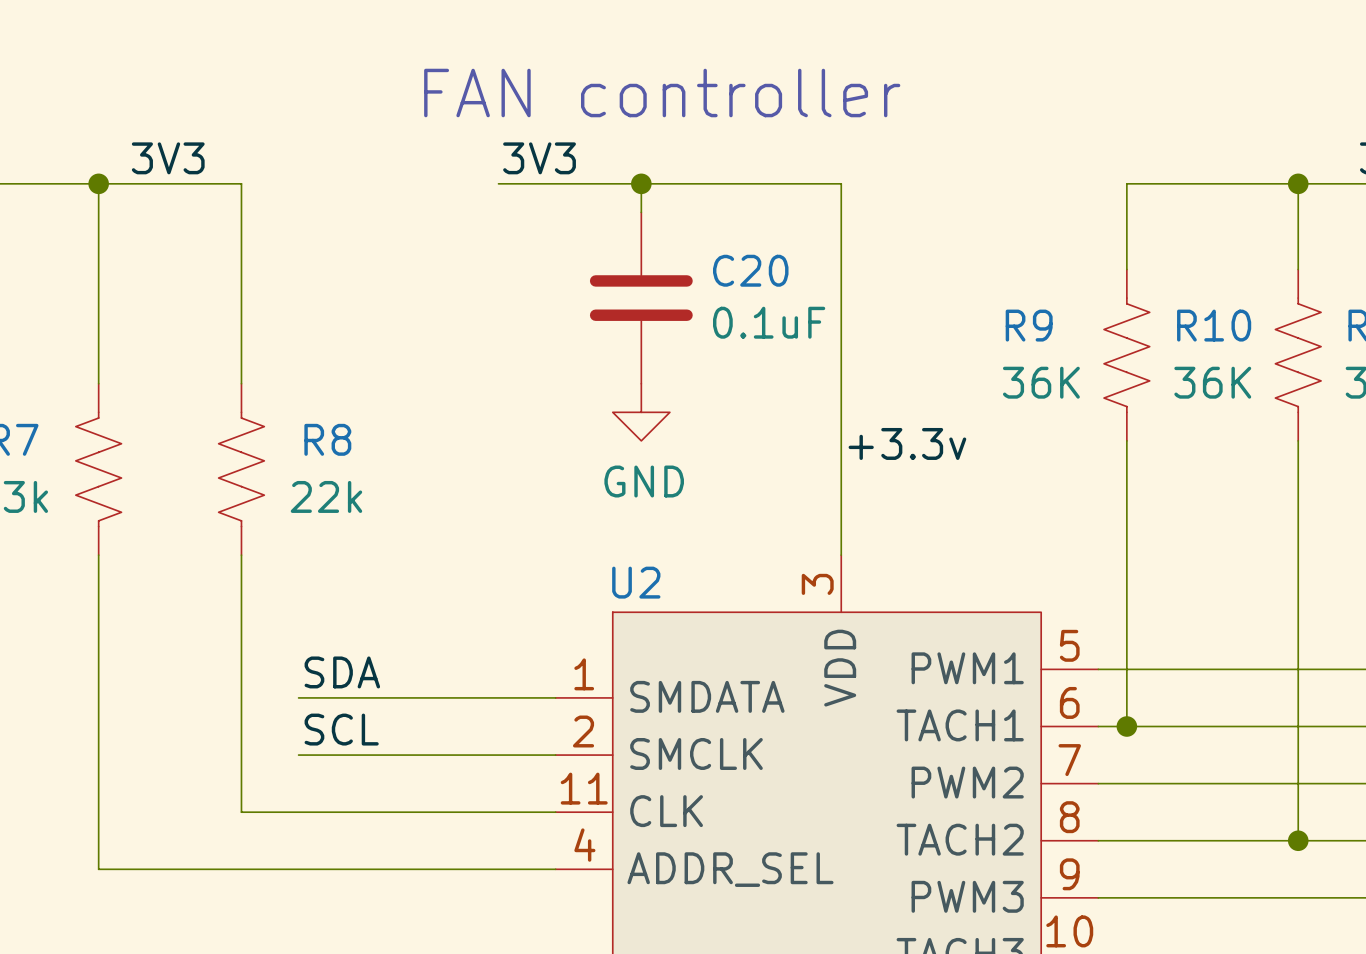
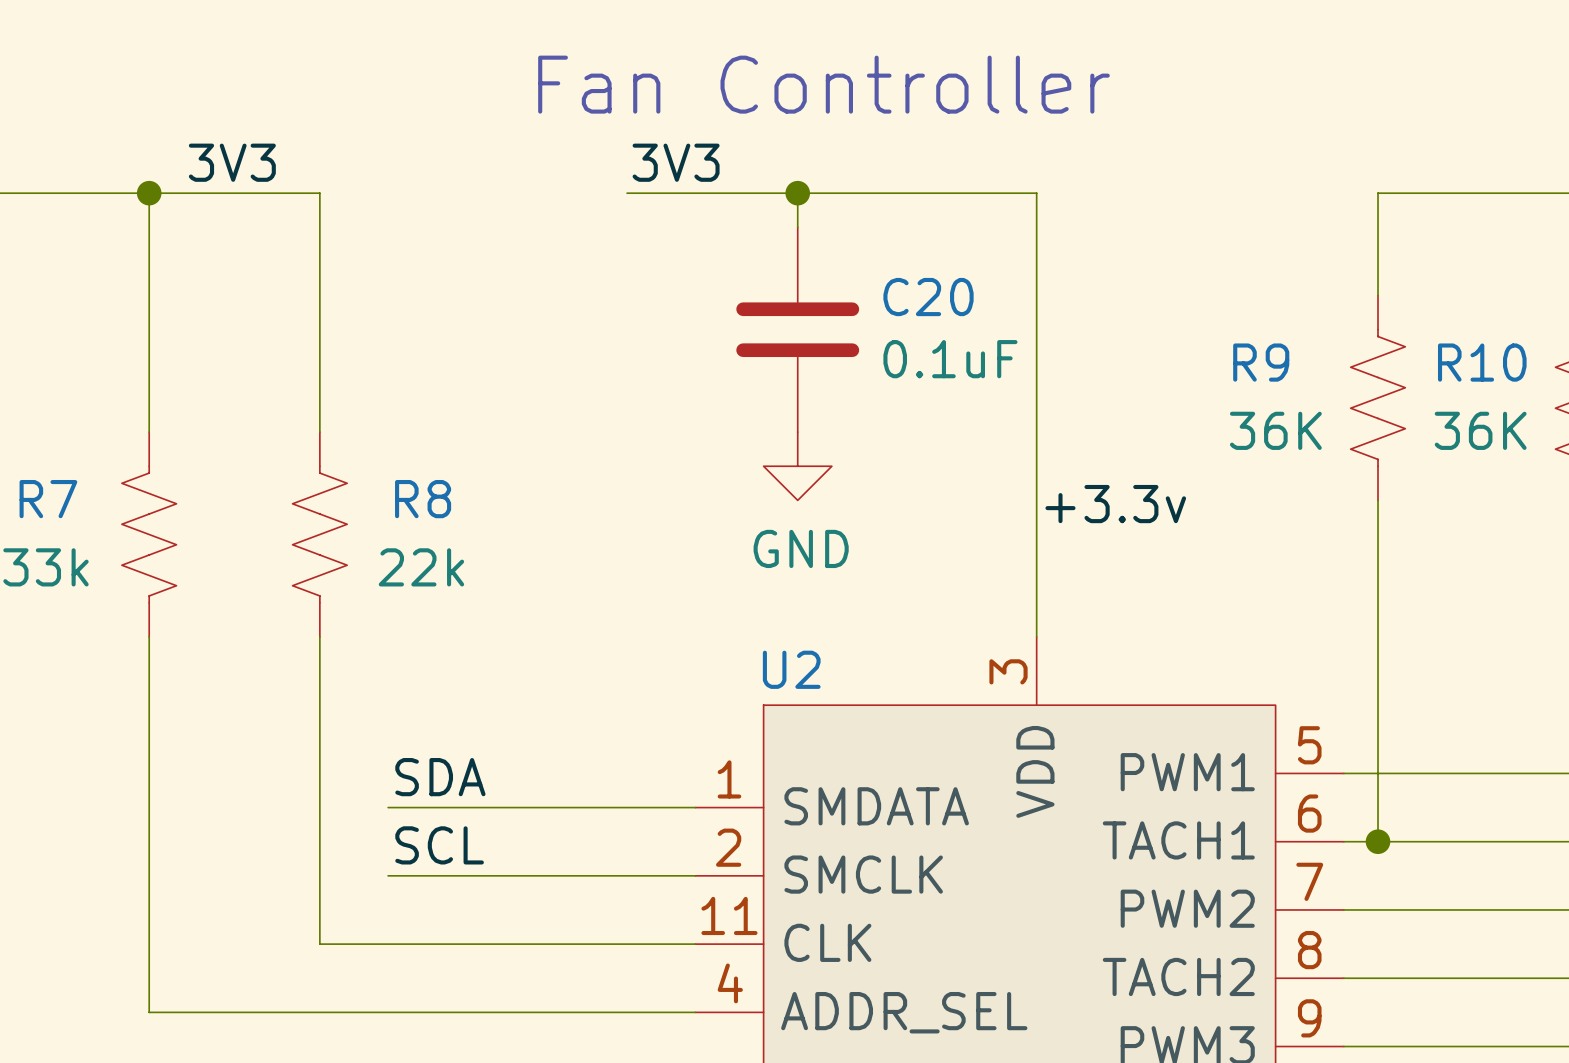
text: FAN controller (662, 93) -> Fan Controller (823, 84)

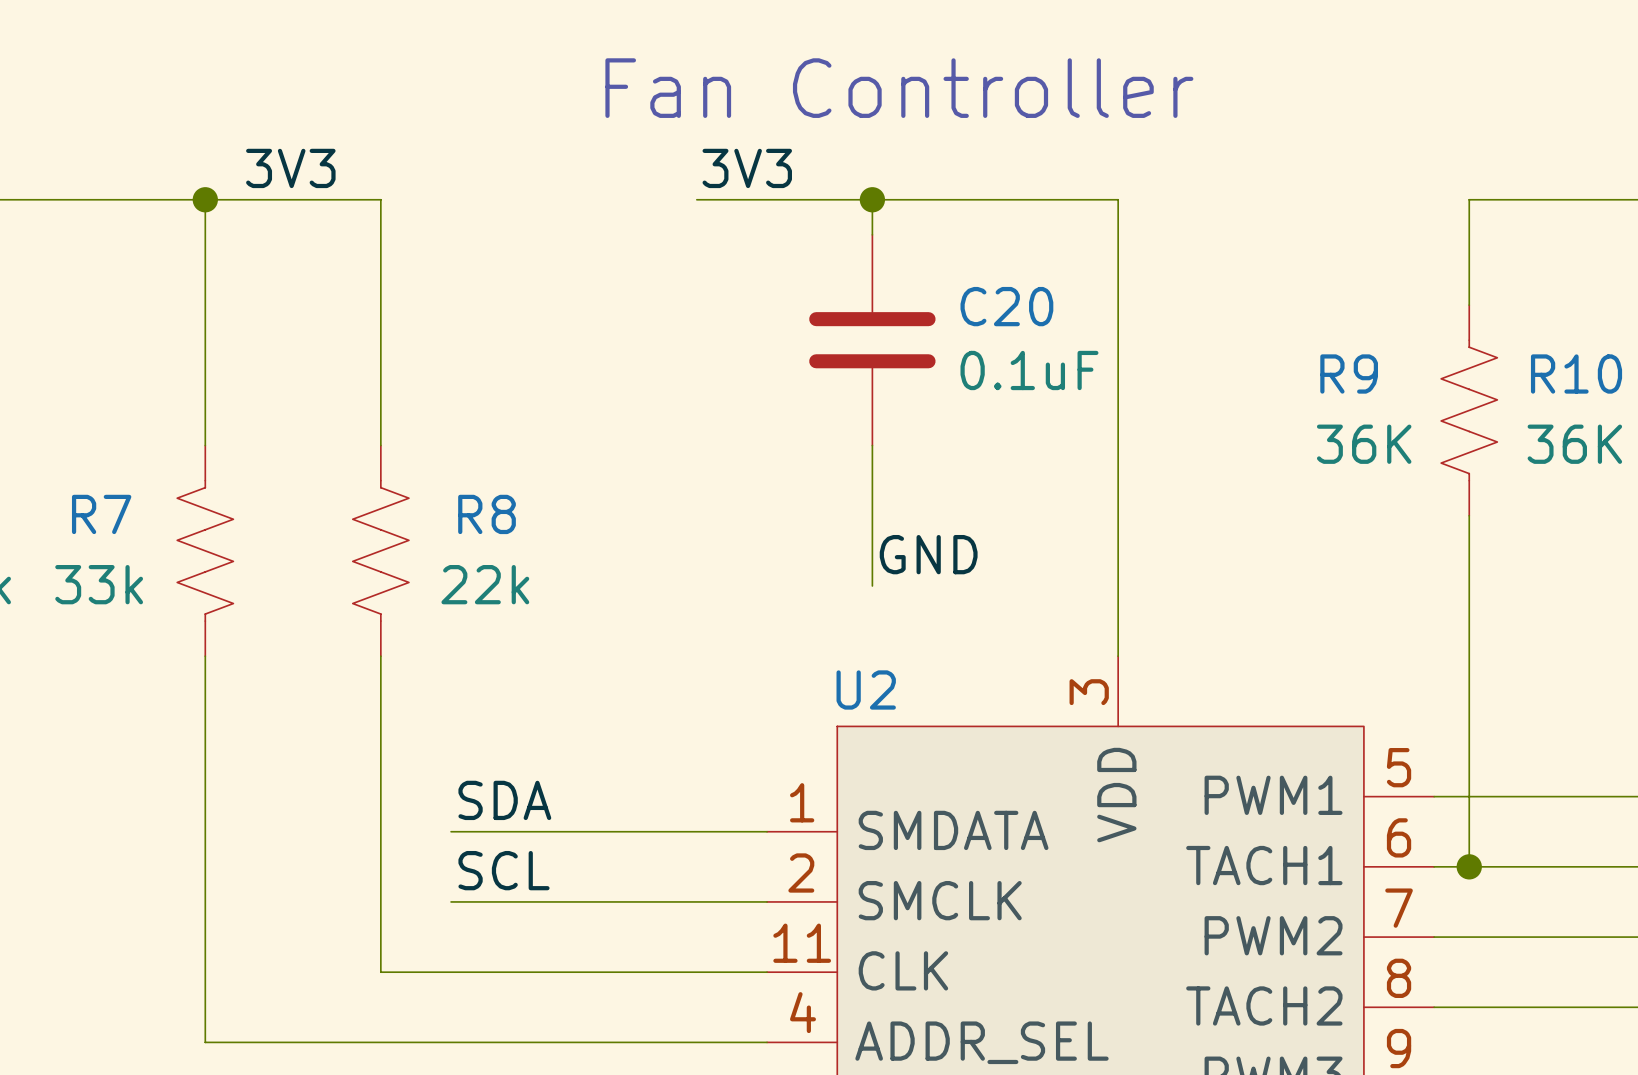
wire: none -> (872, 445) (872, 585)
power symbol: GND (797, 466) -> none
label: +3.3v (1115, 504) -> none
label: none -> GND (928, 554)

